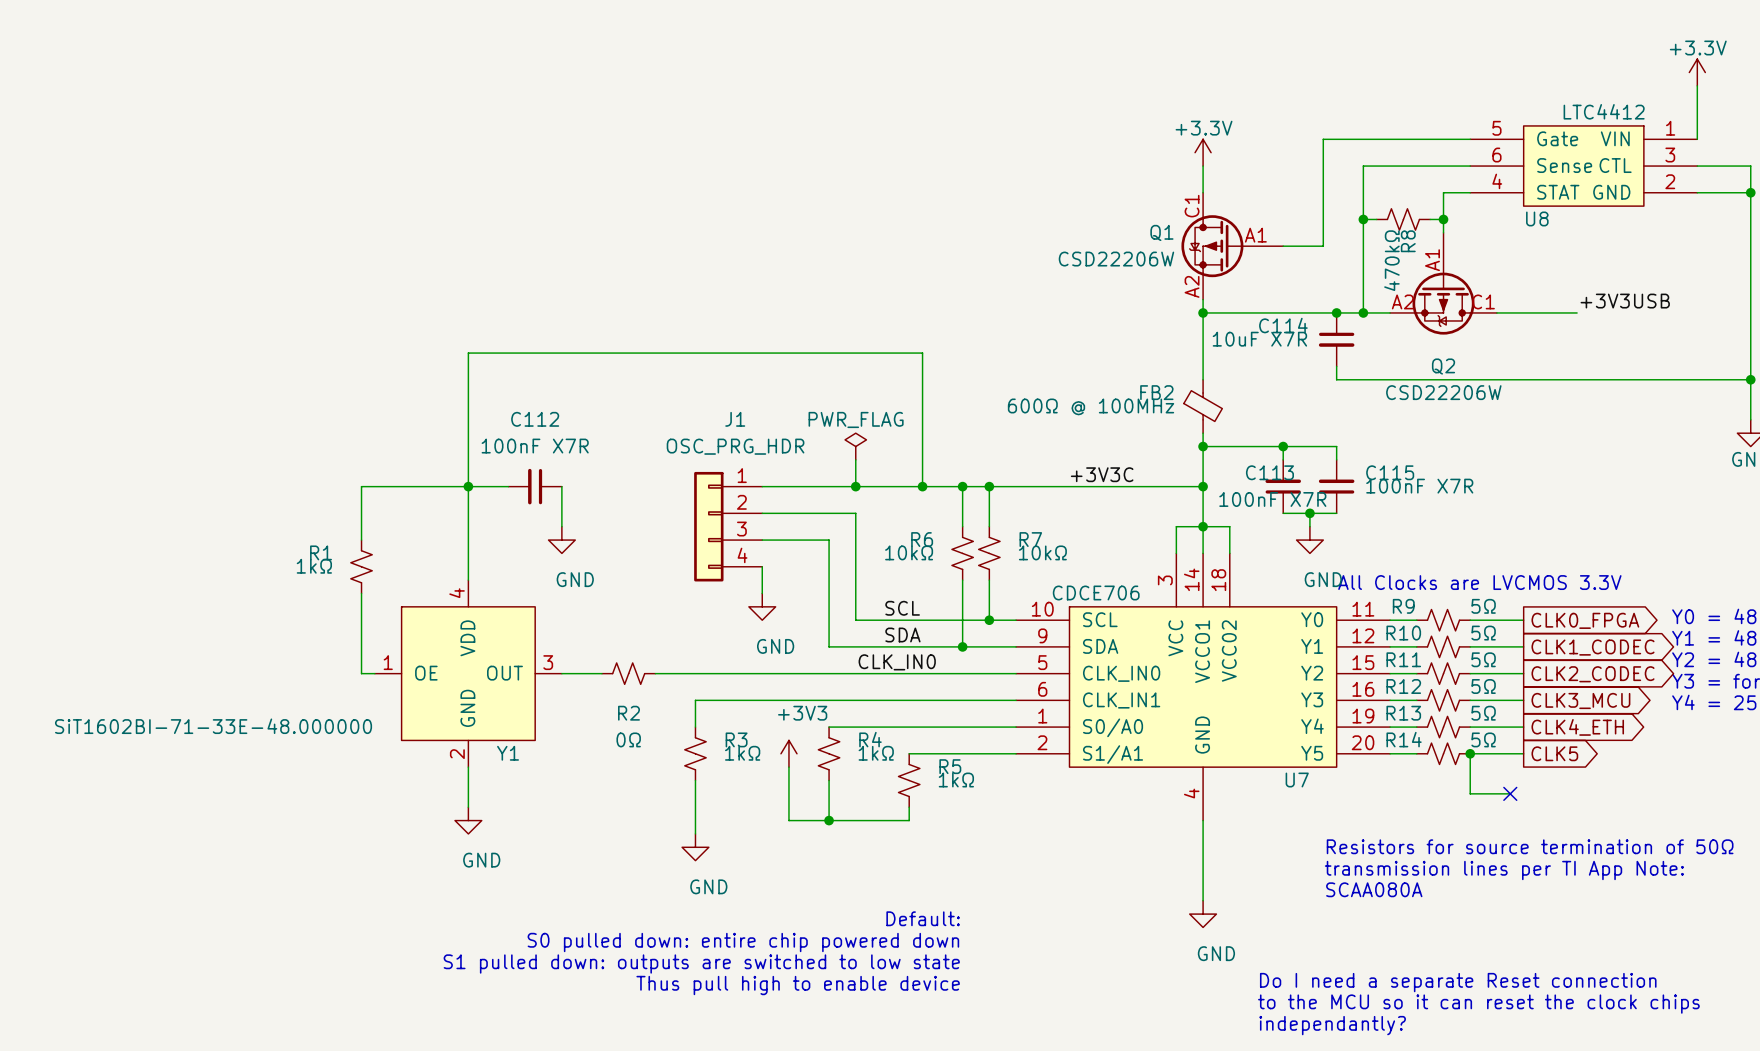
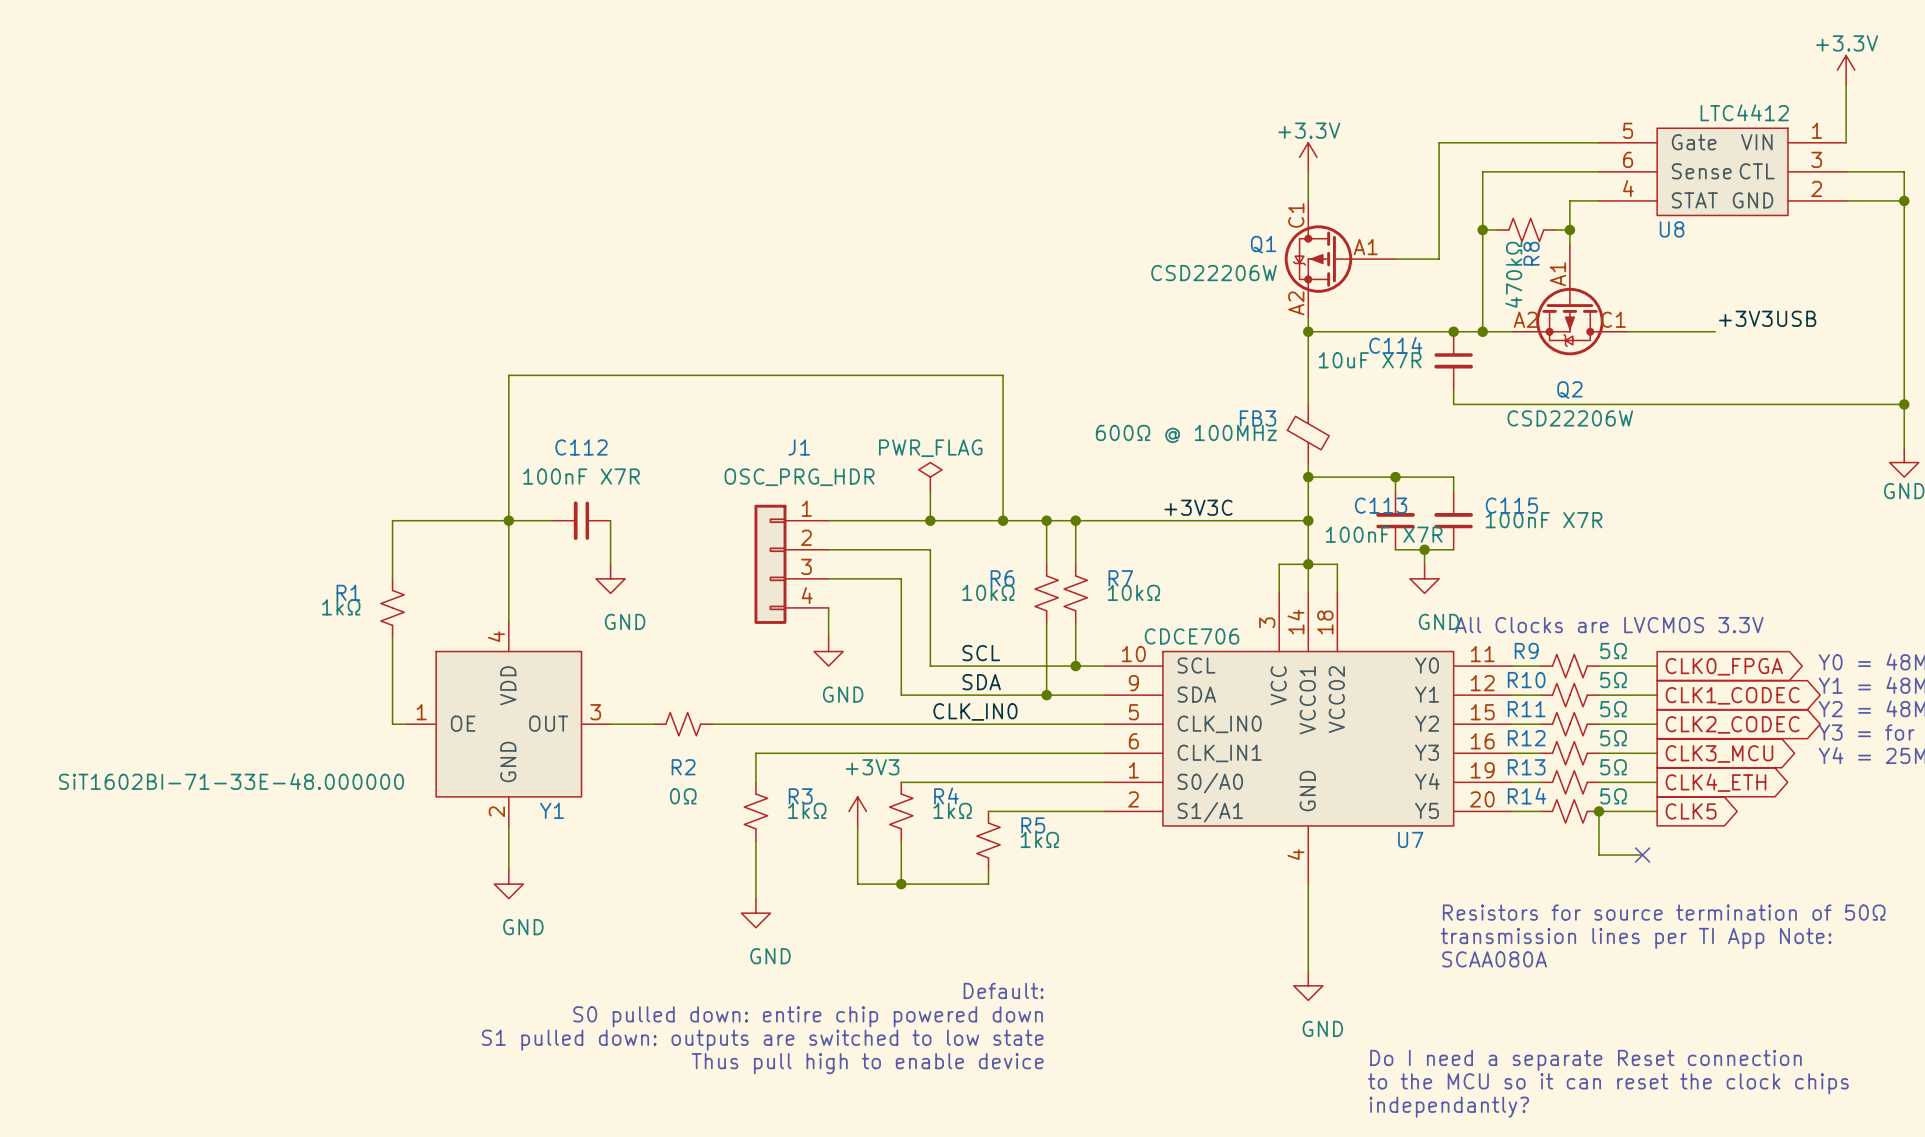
FB2 name: FB2 (1156, 392) -> FB3 (1257, 418)

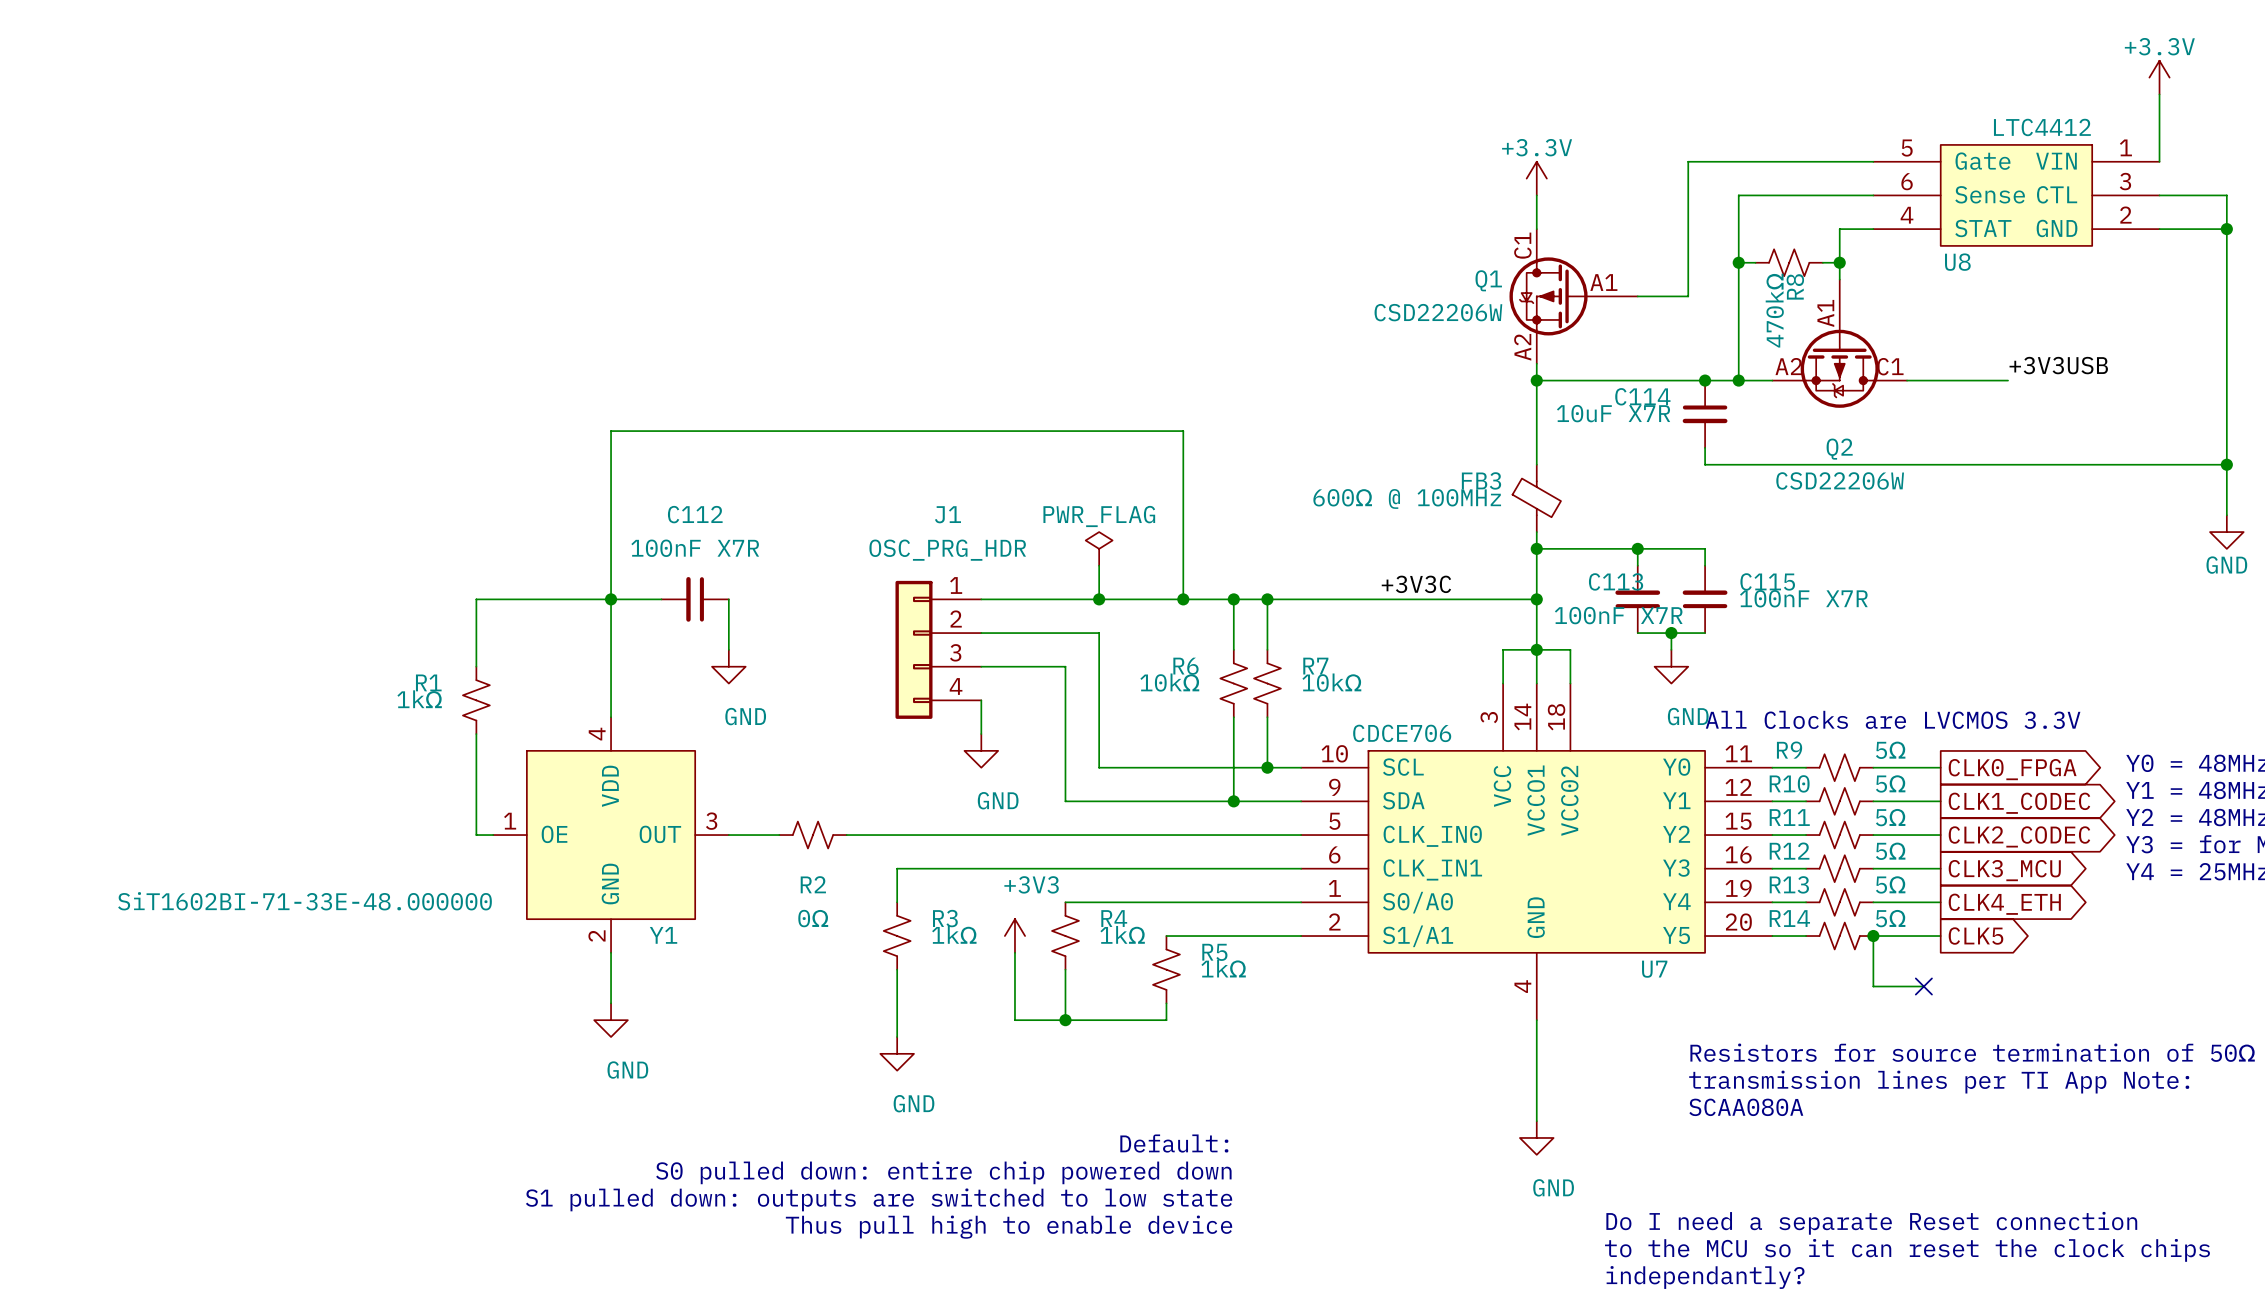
label: SCL (981, 653) -> none
label: SDA (981, 682) -> none
label: CLK_IN0 (975, 711) -> none

